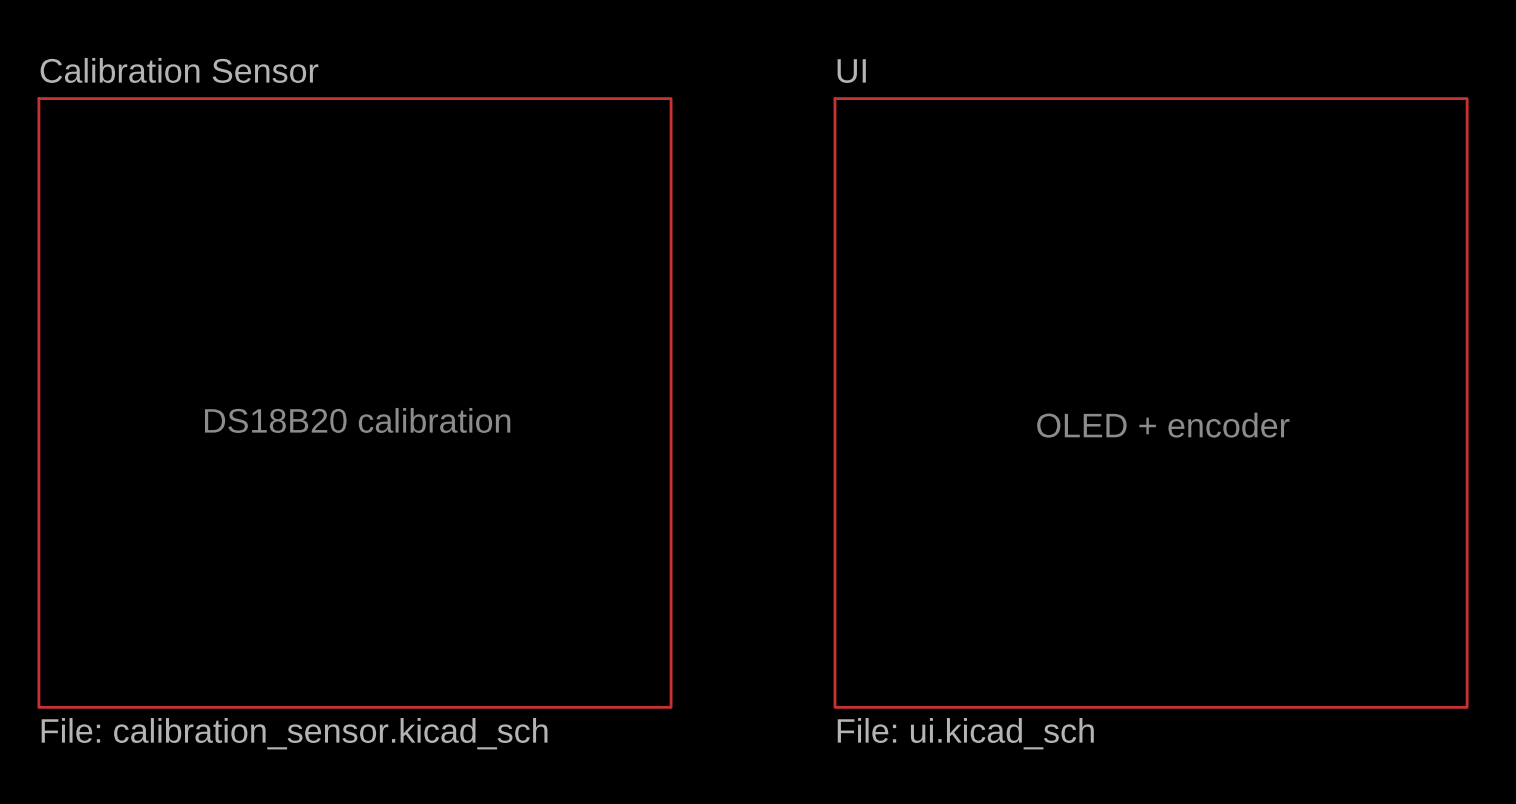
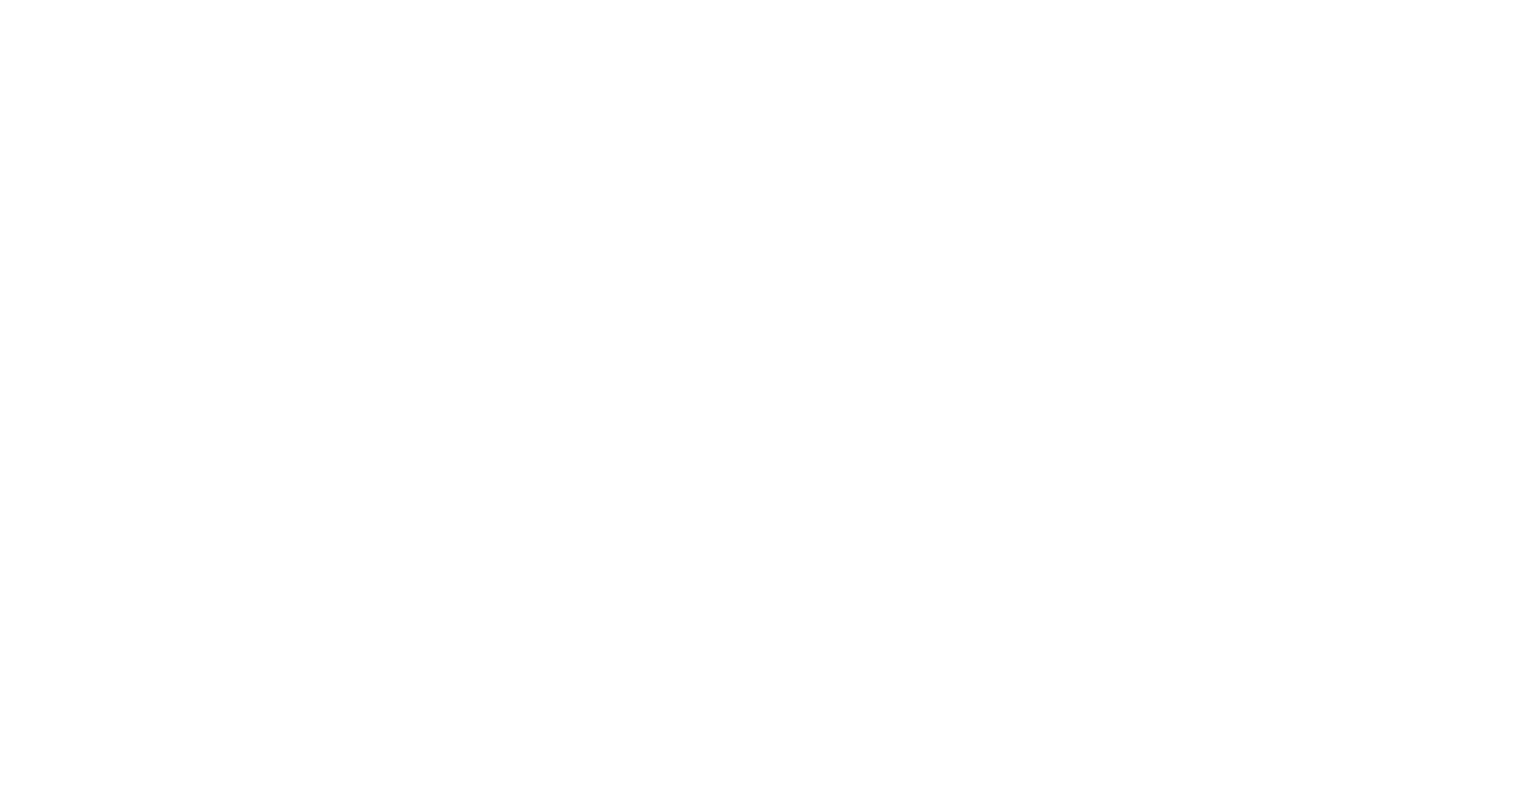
sheet Calibration Sensor: File: calibration_sensor.kicad_sch (354, 402) -> none
sheet UI: File: ui.kicad_sch (1151, 402) -> none
text: DS18B20 calibration (357, 420) -> none
text: OLED + encoder (1163, 425) -> none

